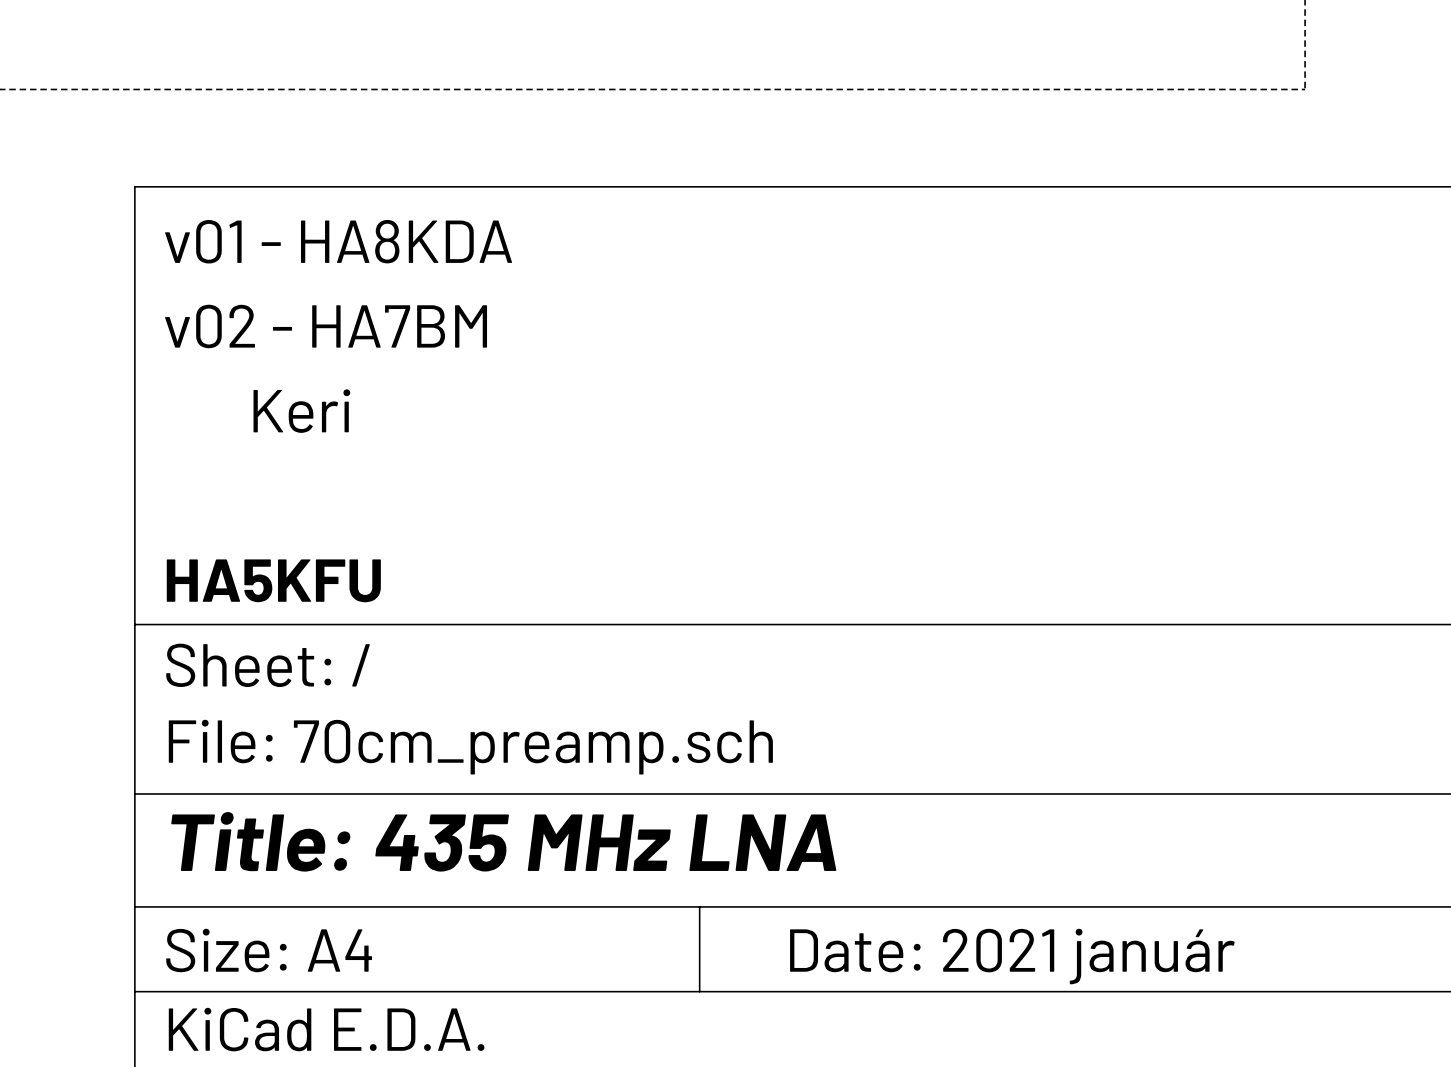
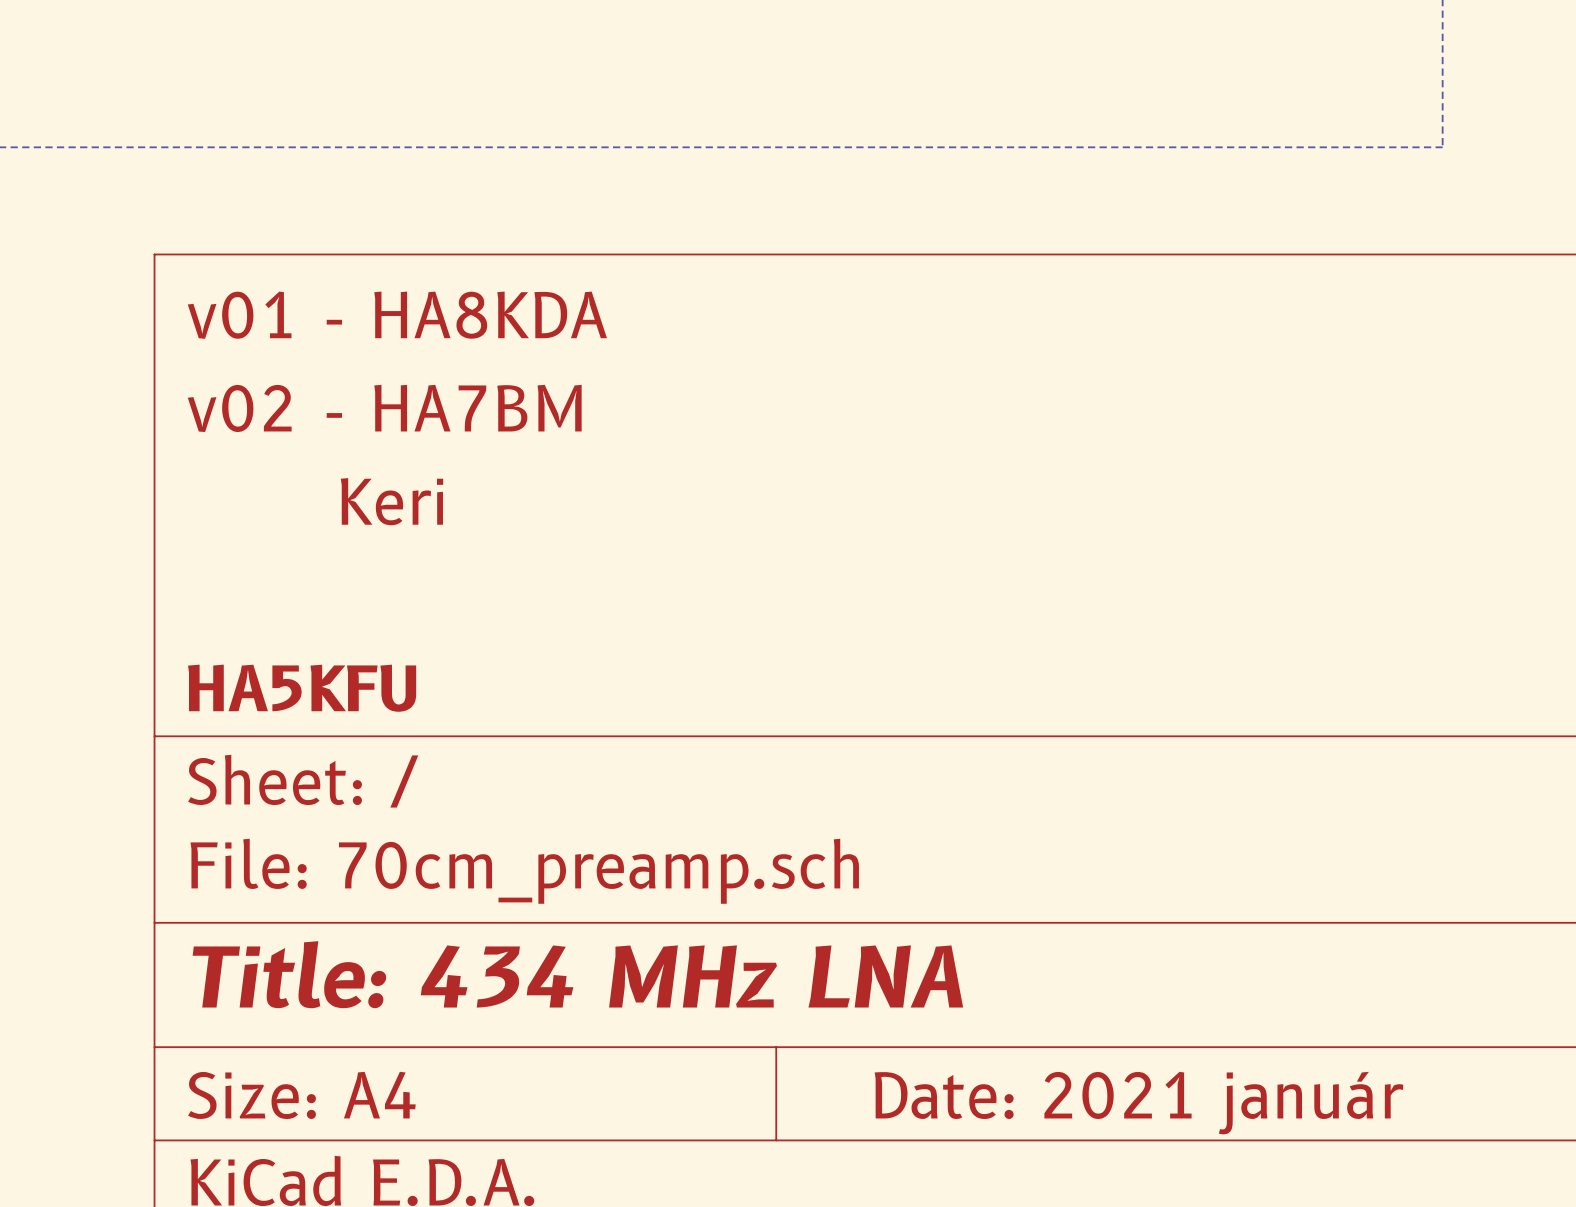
title block: Title: 435 MHz LNA (503, 841) -> Title: 434 MHz LNA (577, 974)

